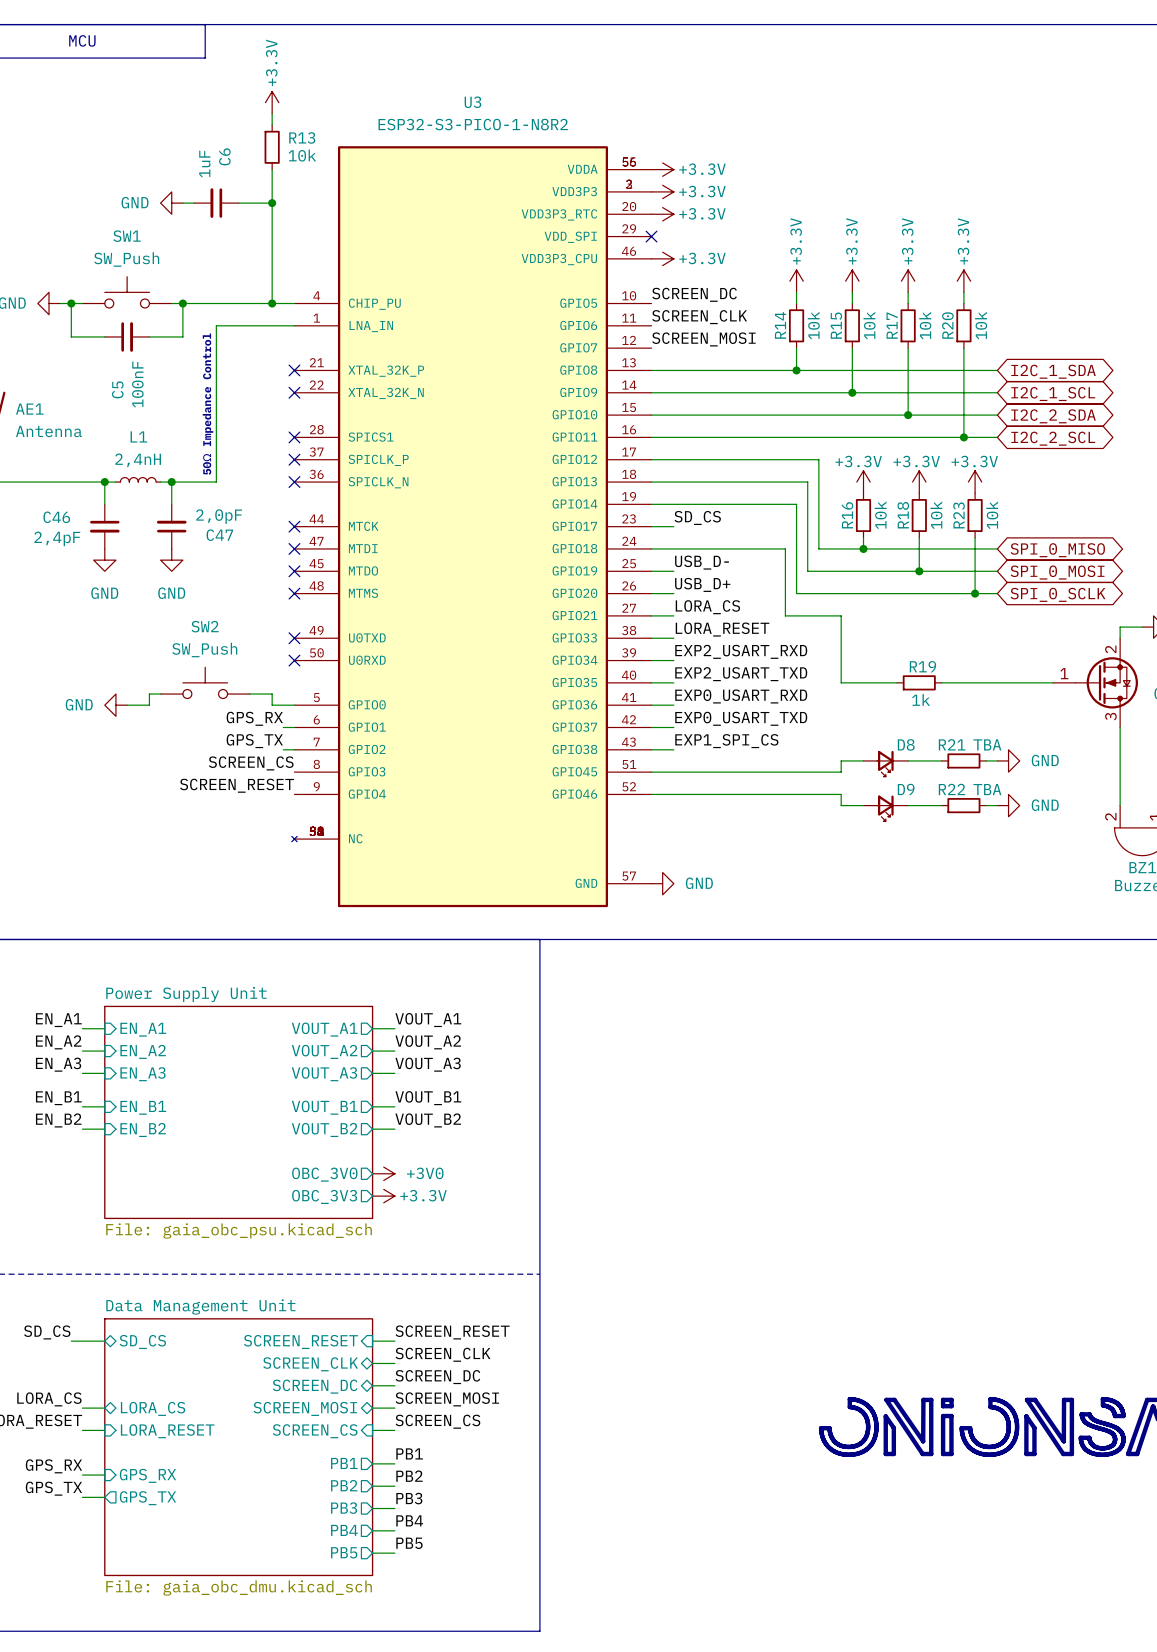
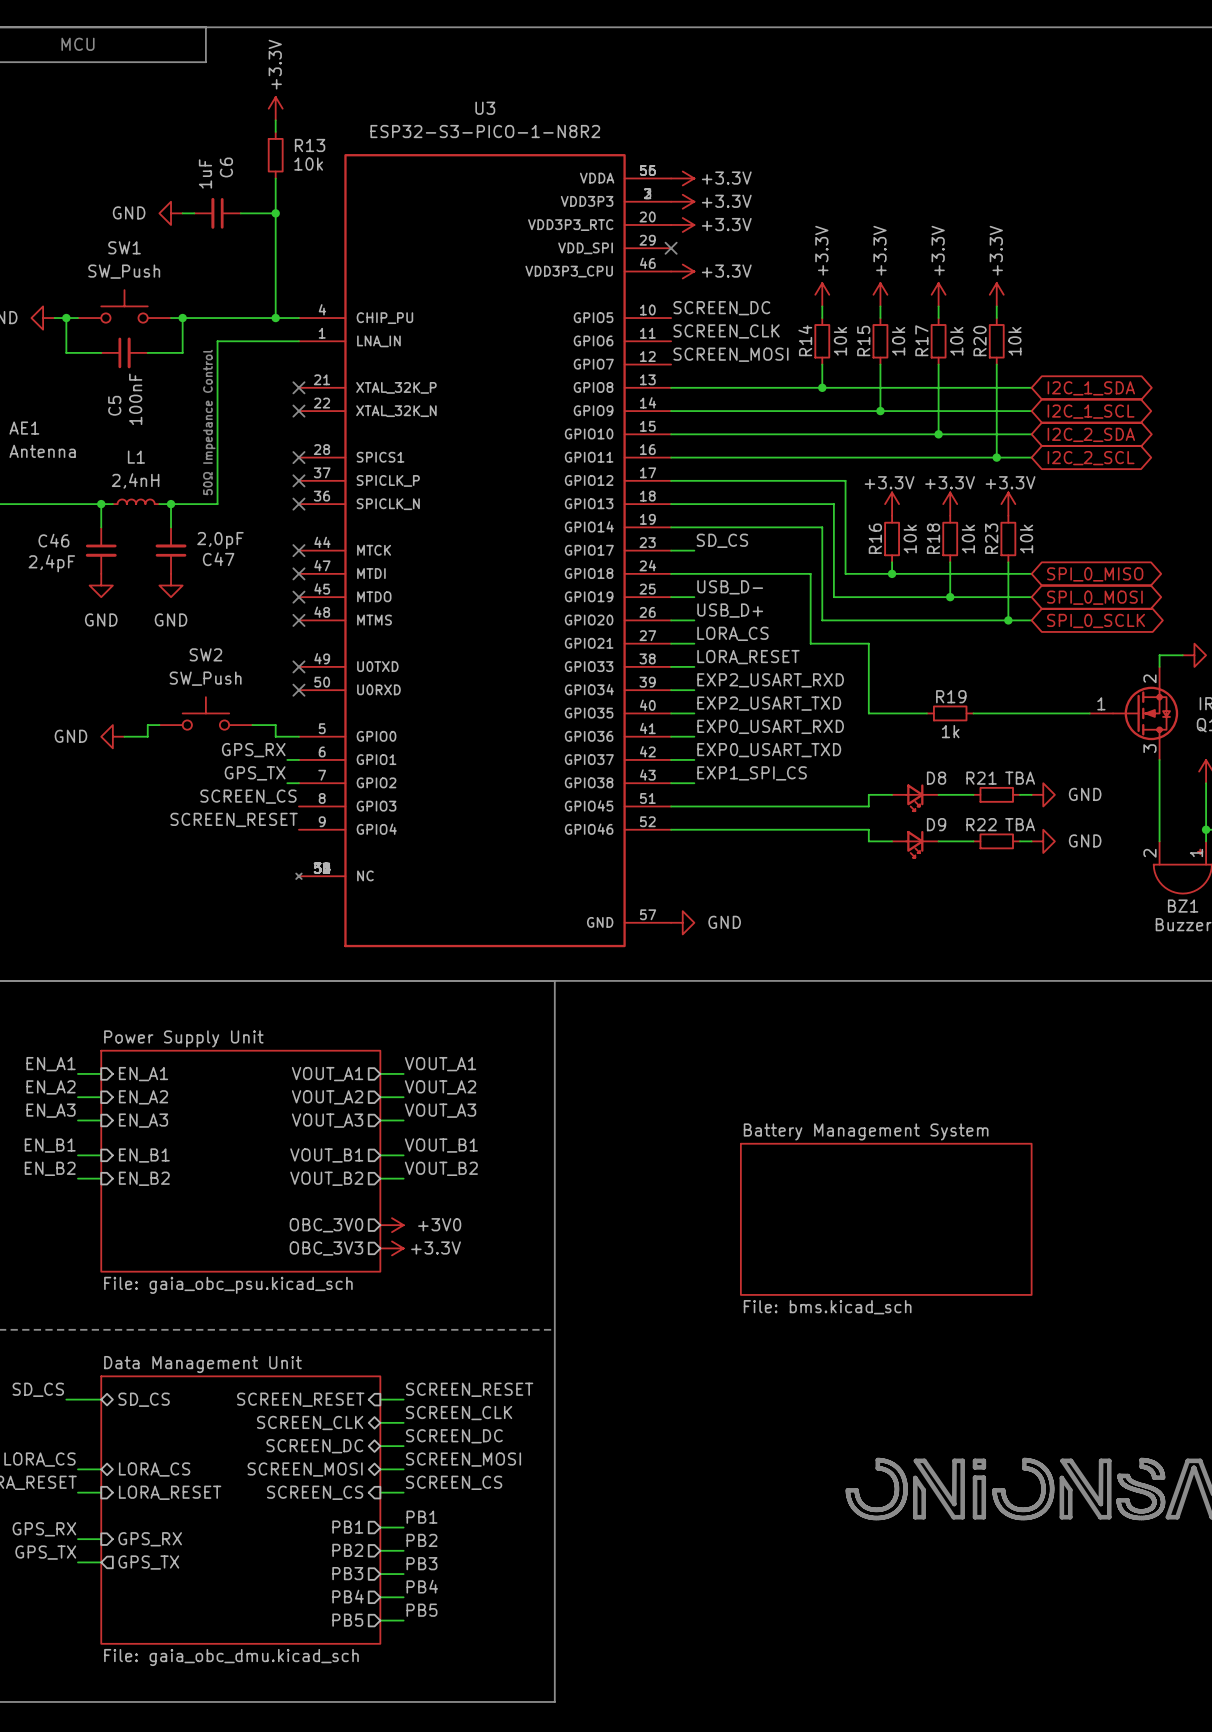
sheet Battery Management System: none -> File: bms.kicad_sch (886, 1219)

